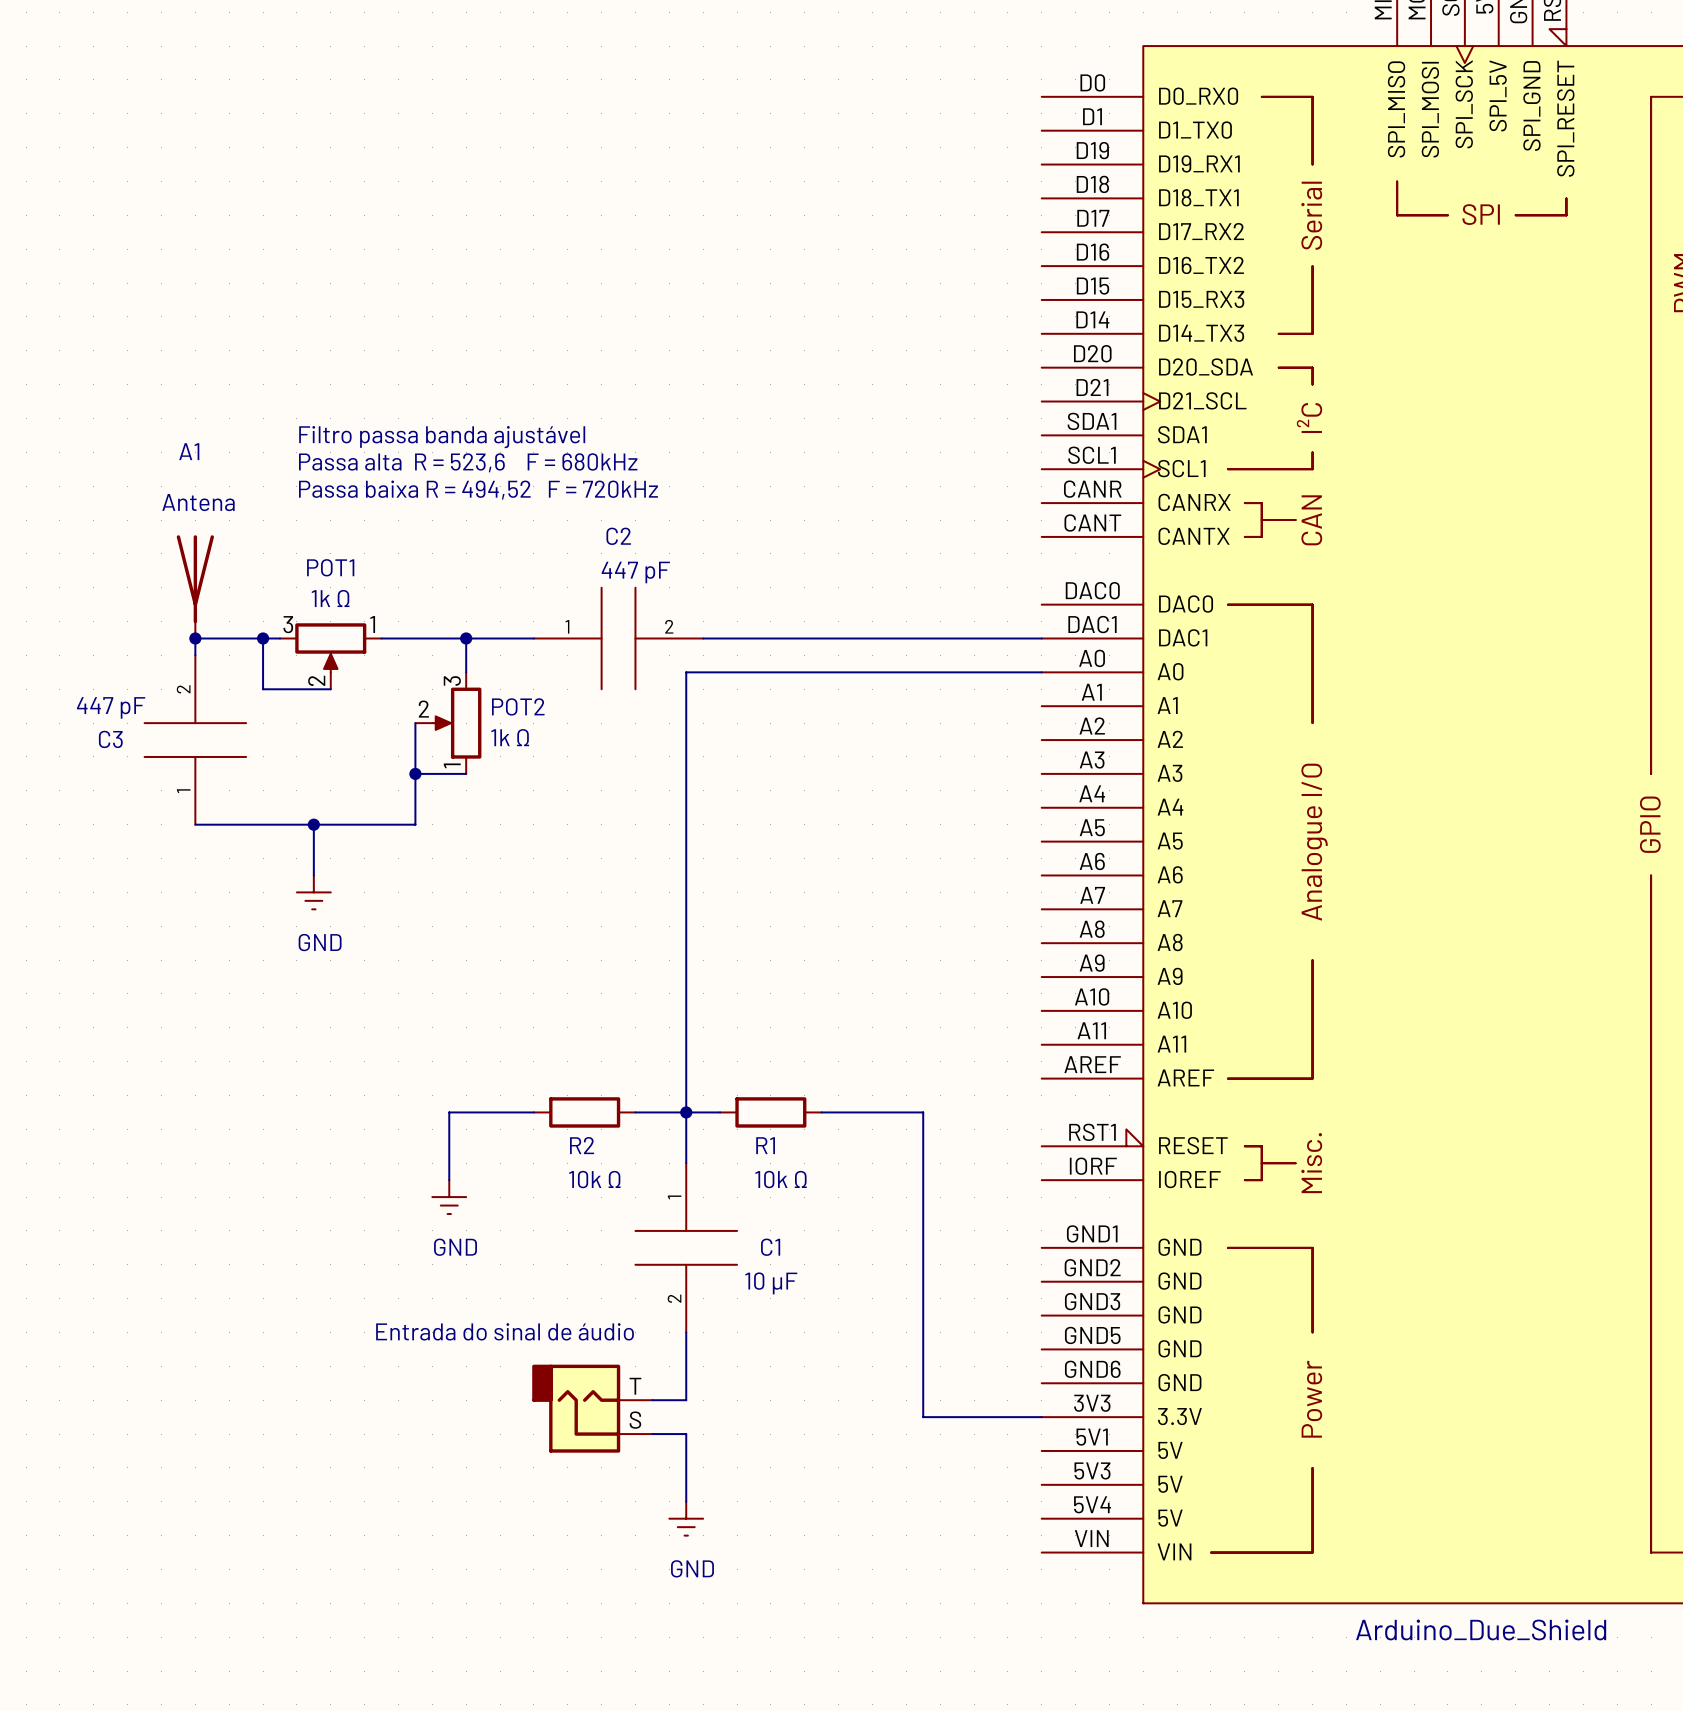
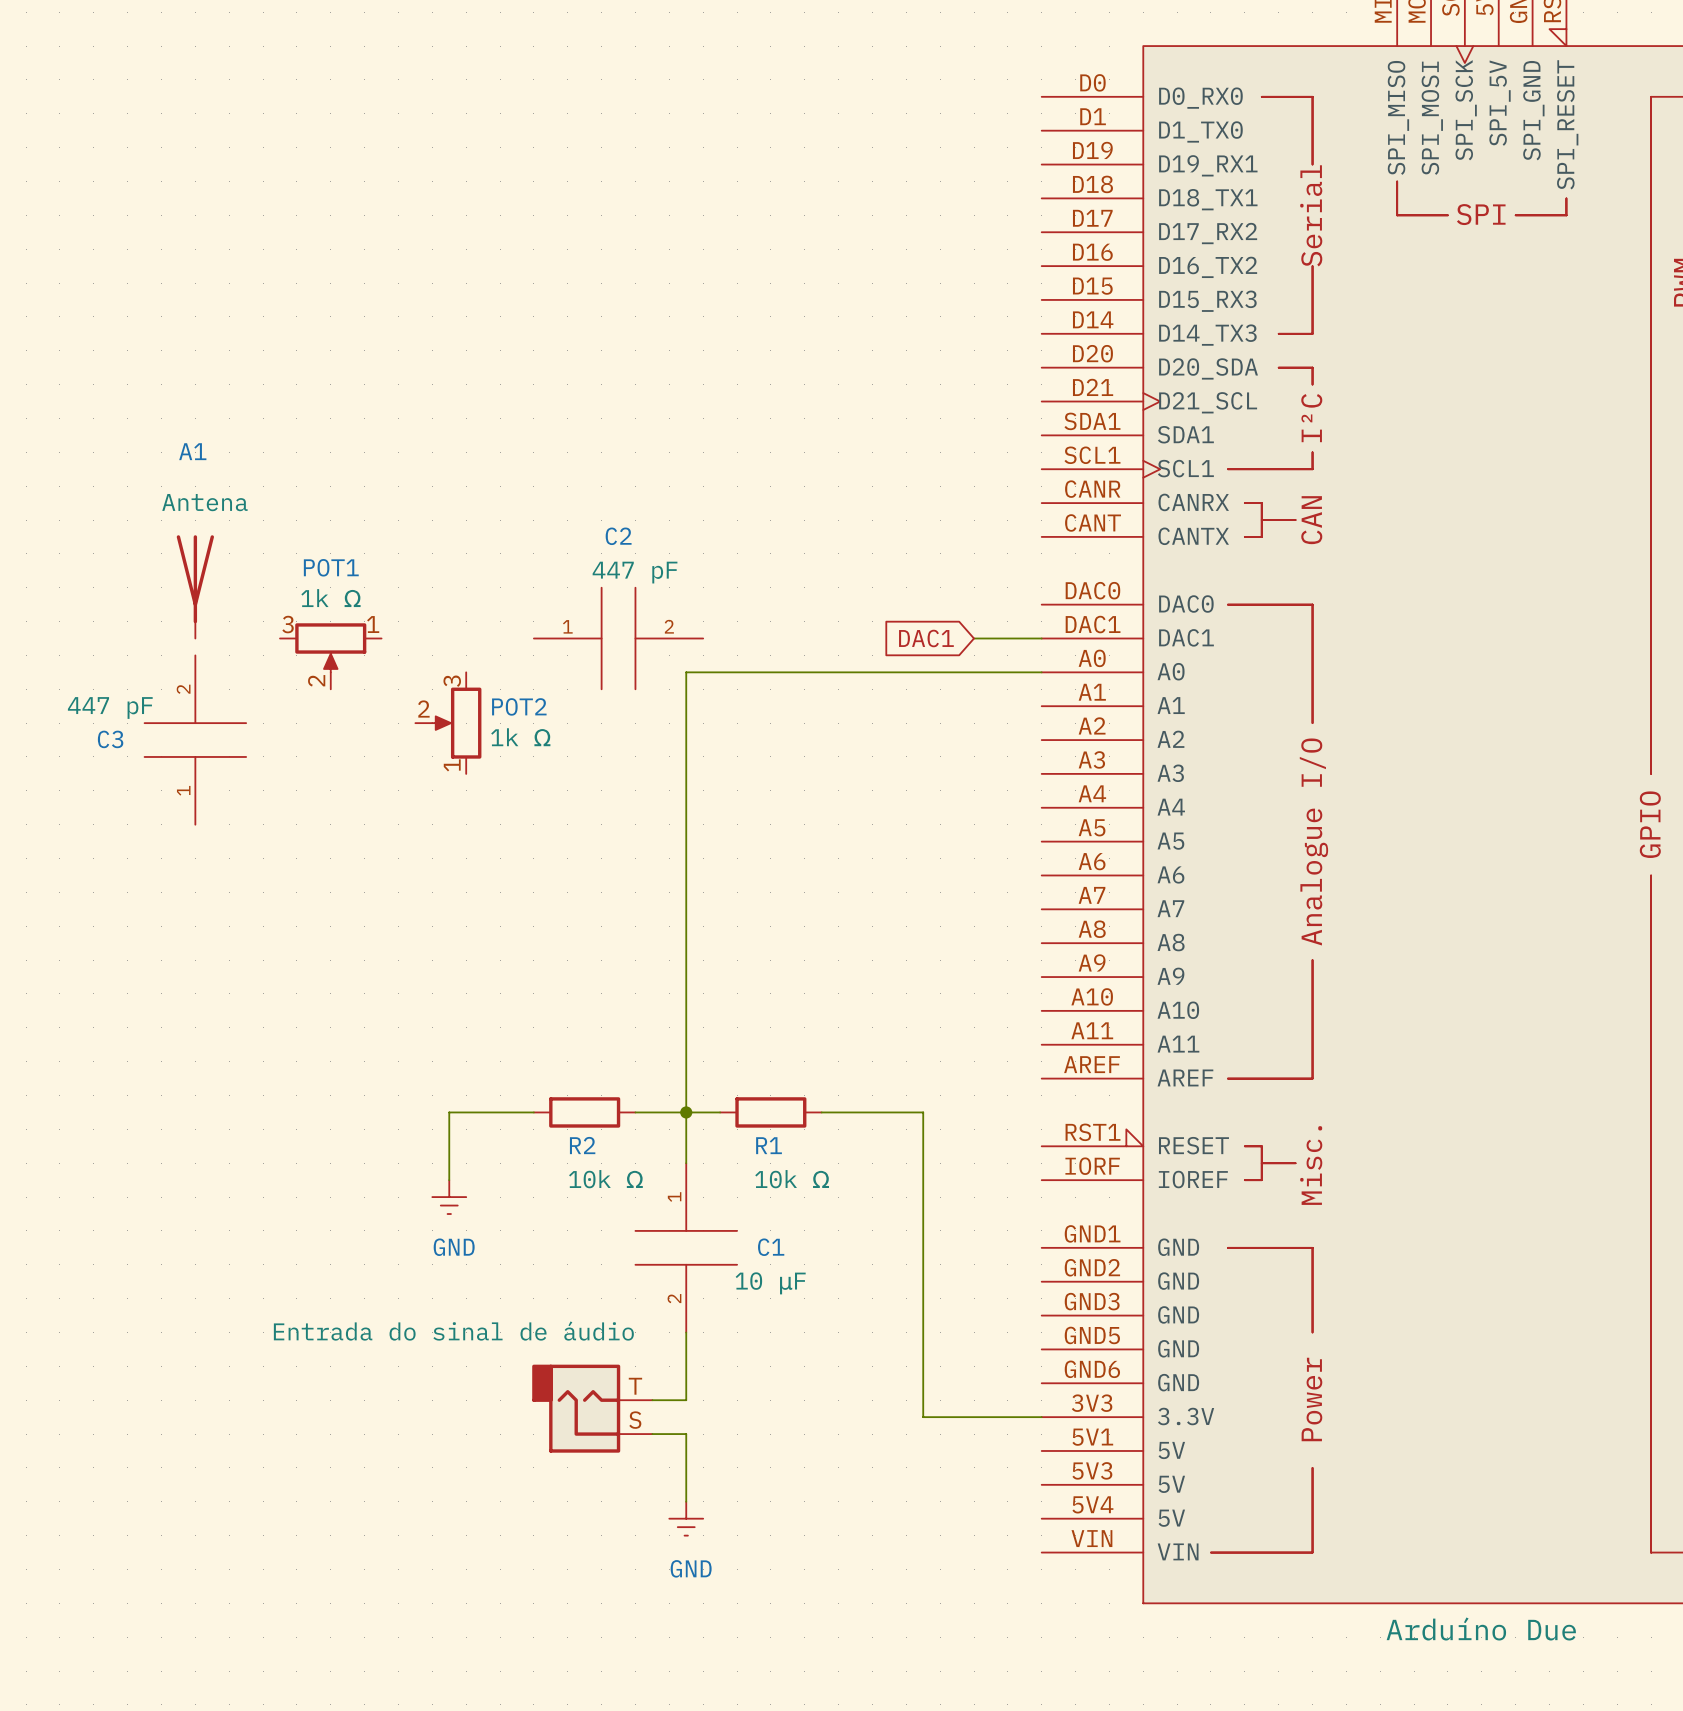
text: Filtro passa banda ajustável (442, 437) -> none
text: Passa alta R = 523,6 F = 680kHz (468, 462) -> none
text: Passa baixa R = 494,52 F = 720kHz (478, 490) -> none
junction: (195, 638) -> none
wire: (263, 638) (263, 689) (330, 689) -> none
junction: (263, 638) -> none
wire: (279, 638) (195, 638) (195, 655) -> none
wire: (381, 638) (533, 638) -> none
wire: (466, 638) (466, 672) -> none
junction: (466, 638) -> none
wire: (703, 638) (974, 638) -> none
global label: none -> DAC1 (926, 638)
wire: (415, 723) (415, 824) (195, 824) -> none
wire: (415, 773) (466, 773) -> none
junction: (415, 773) -> none
wire: (313, 824) (313, 875) -> none
junction: (313, 824) -> none
GND: (313, 892) -> none
part value: Arduino_Due_Shield (1481, 1629) -> Arduíno Due (1481, 1628)

